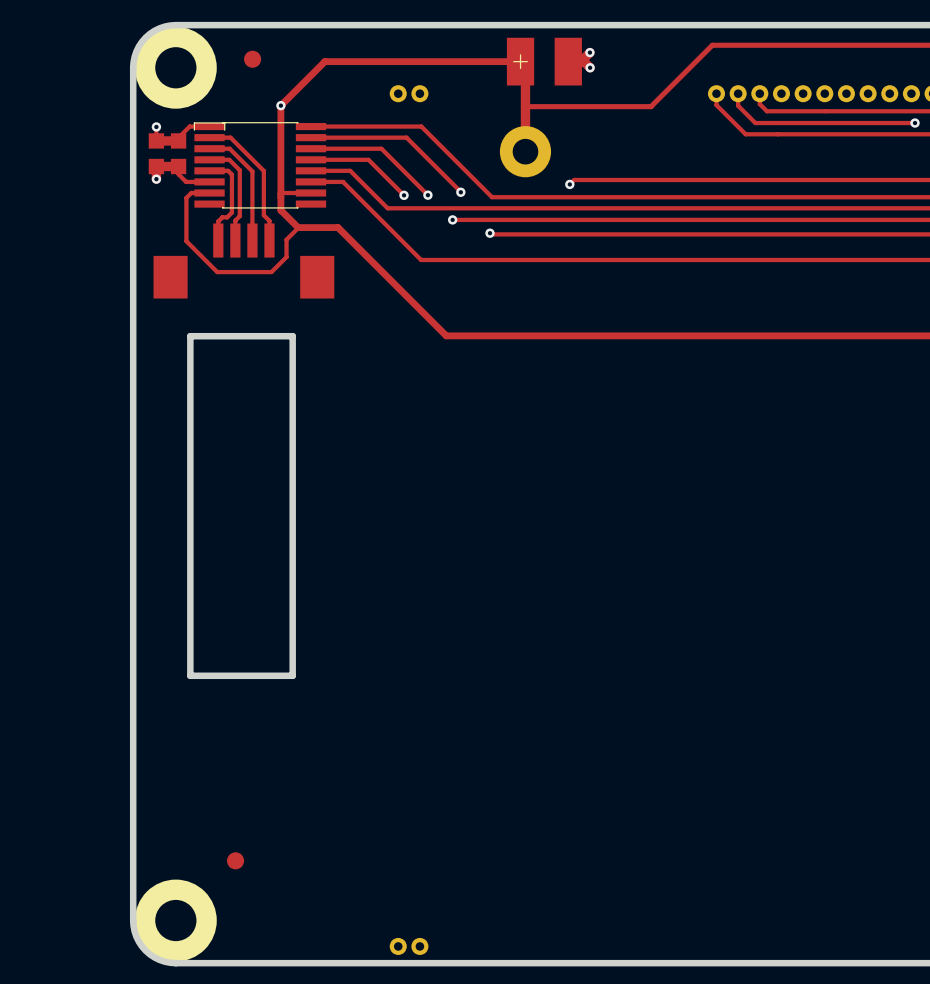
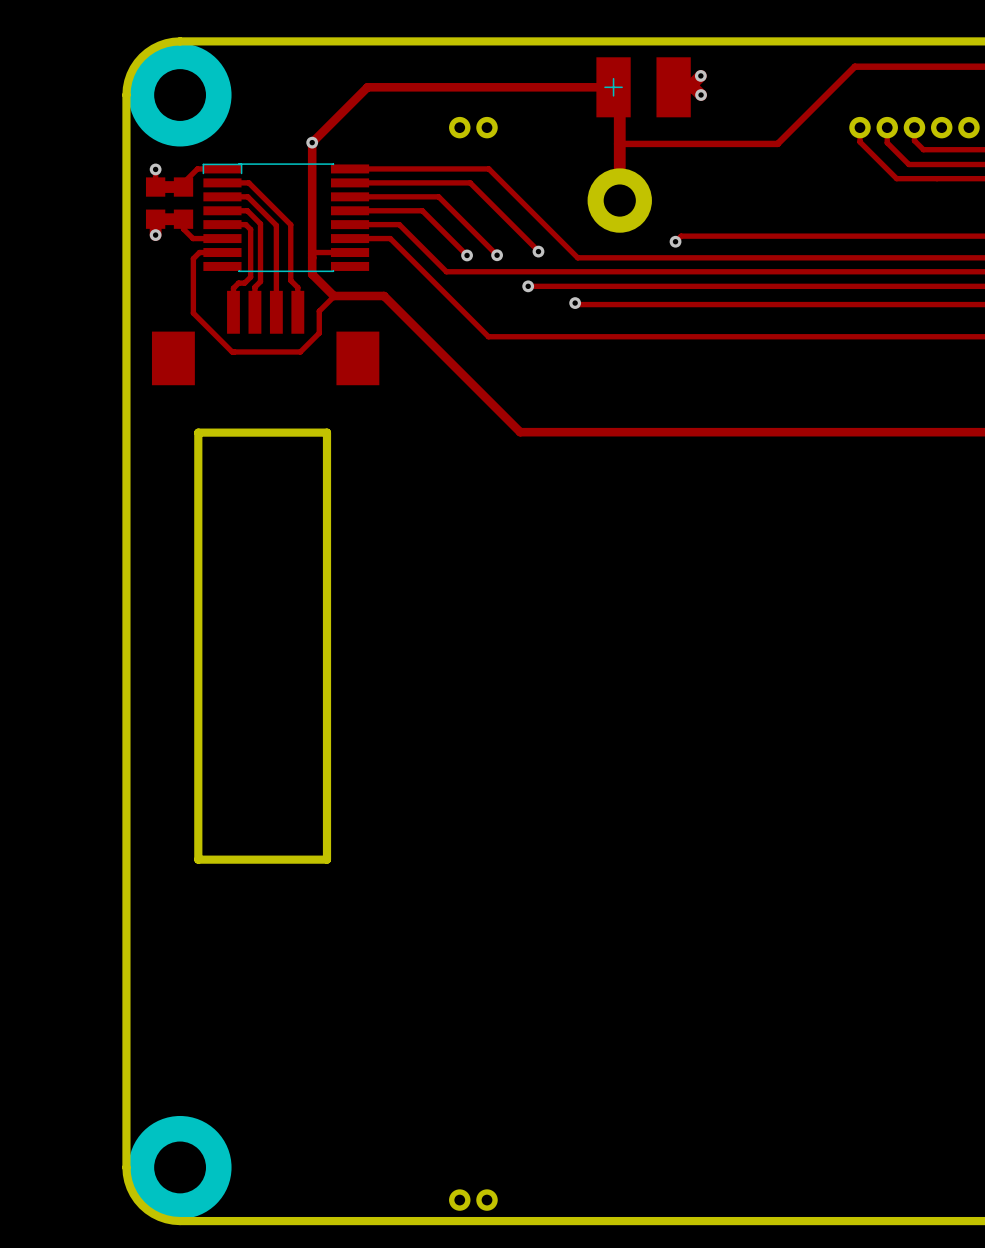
part: (252, 59) -> none
part: (235, 860) -> none

